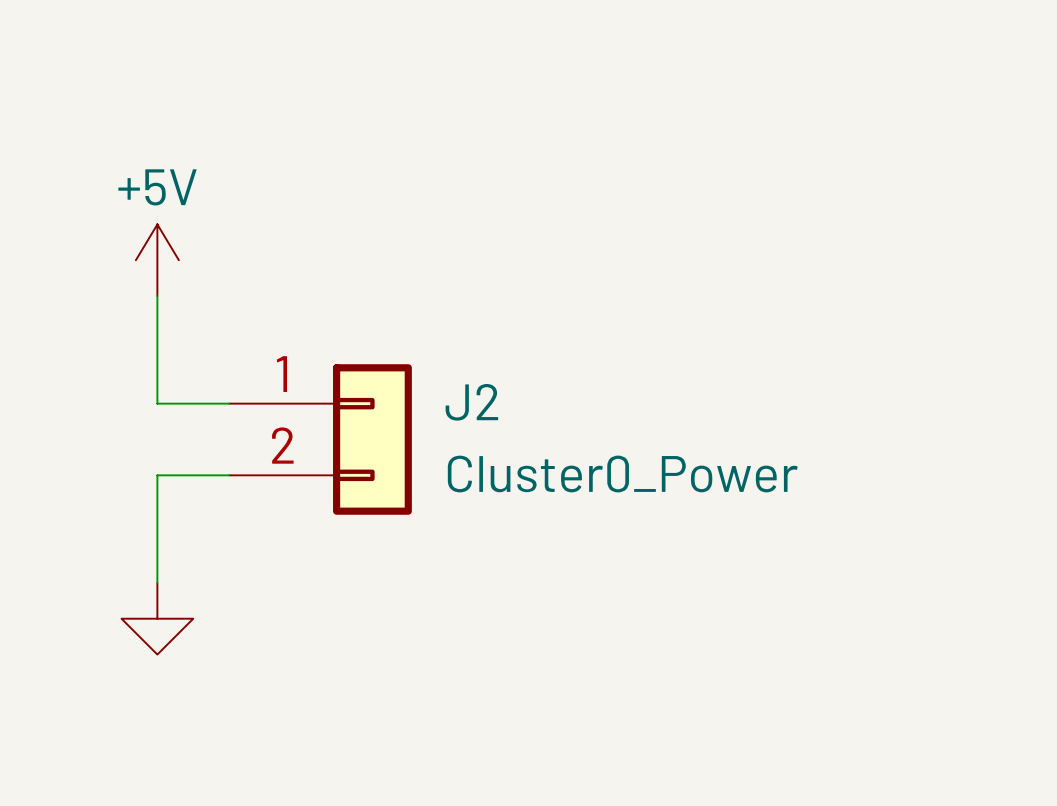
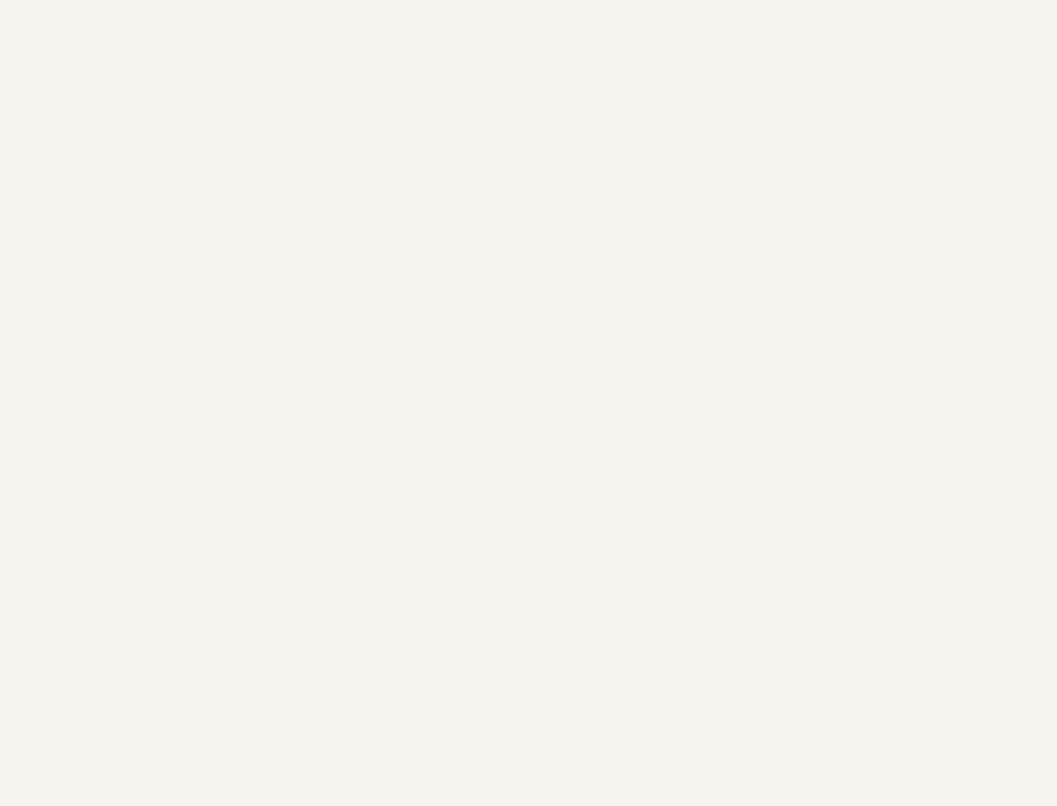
power symbol: +5V (157, 260) -> none
wire: (157, 296) (157, 403) (229, 403) -> none
J2: Cluster0_Power (320, 439) -> none
wire: (229, 475) (157, 475) (157, 582) -> none
power symbol: (157, 618) -> none

